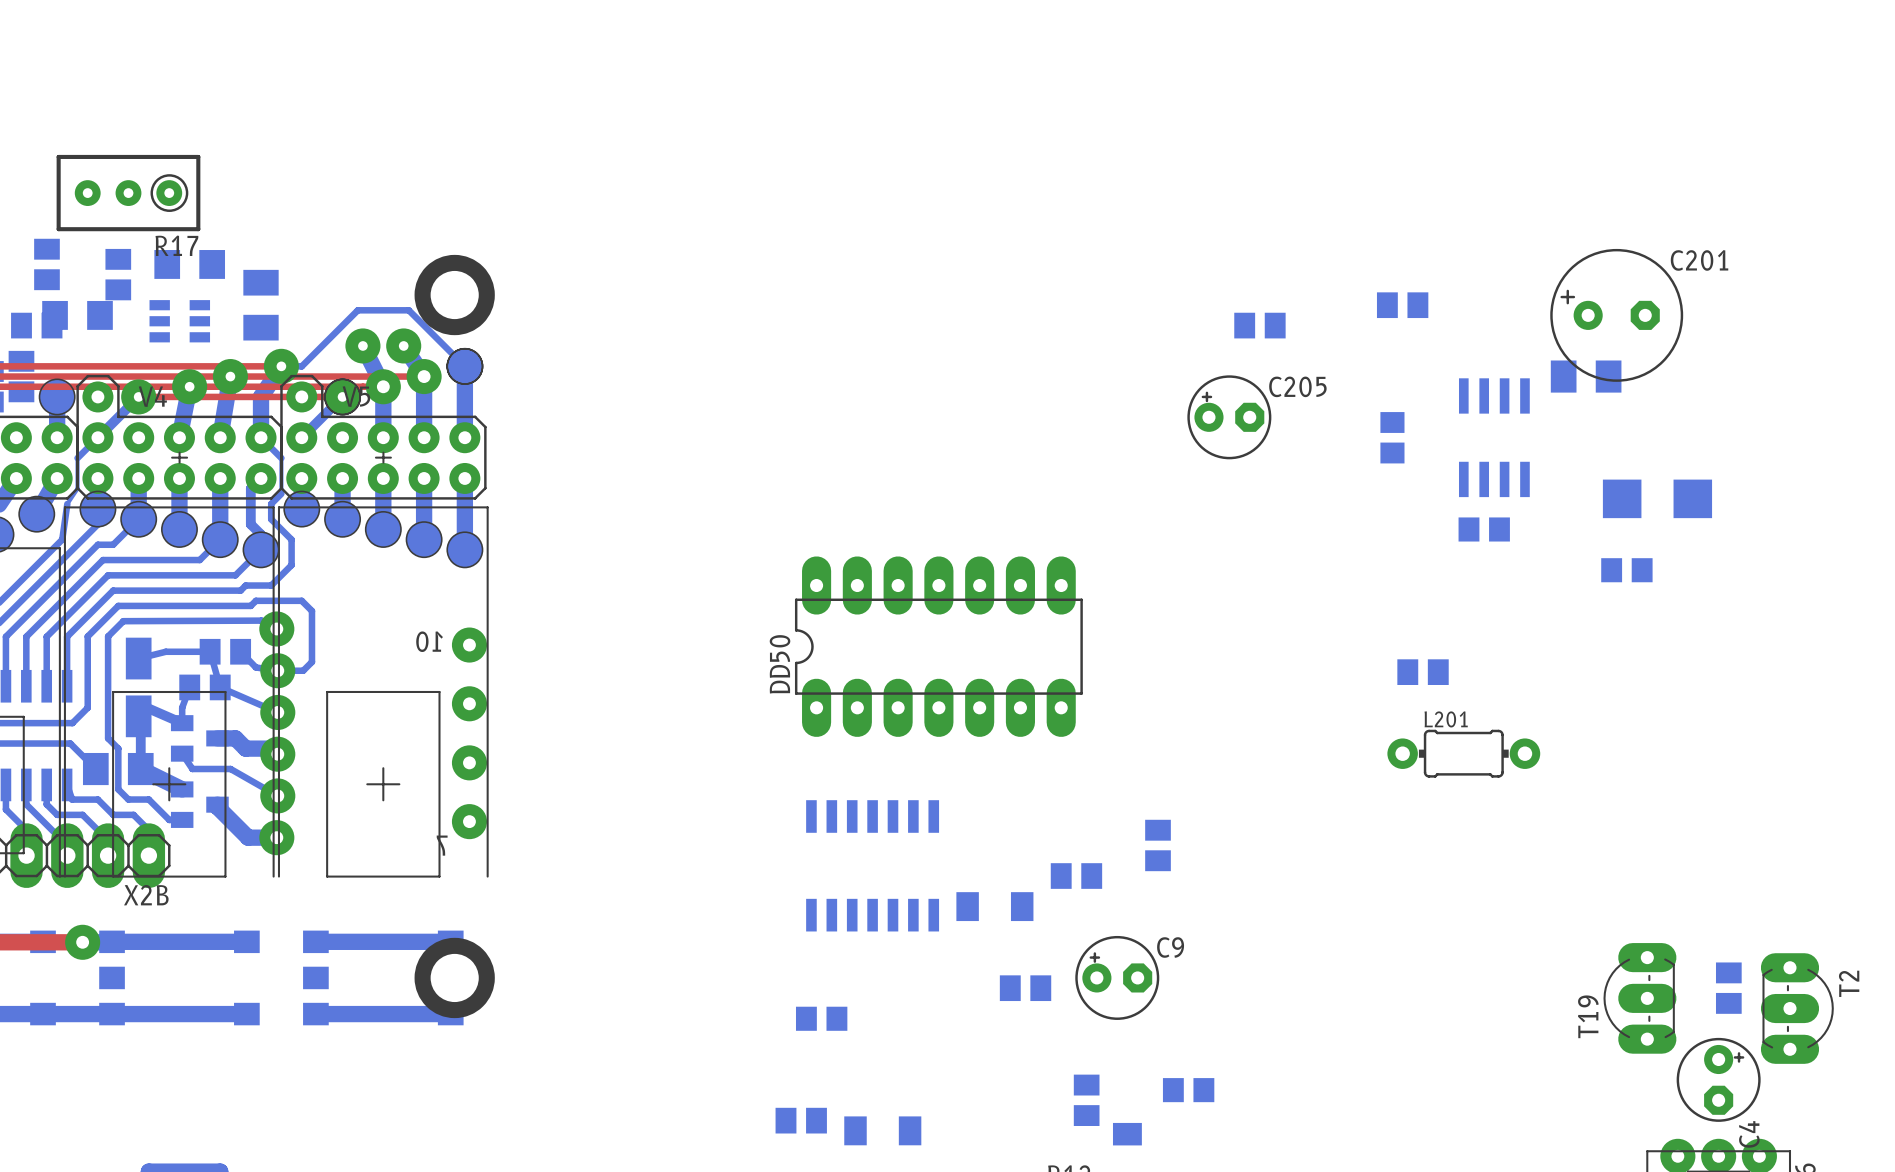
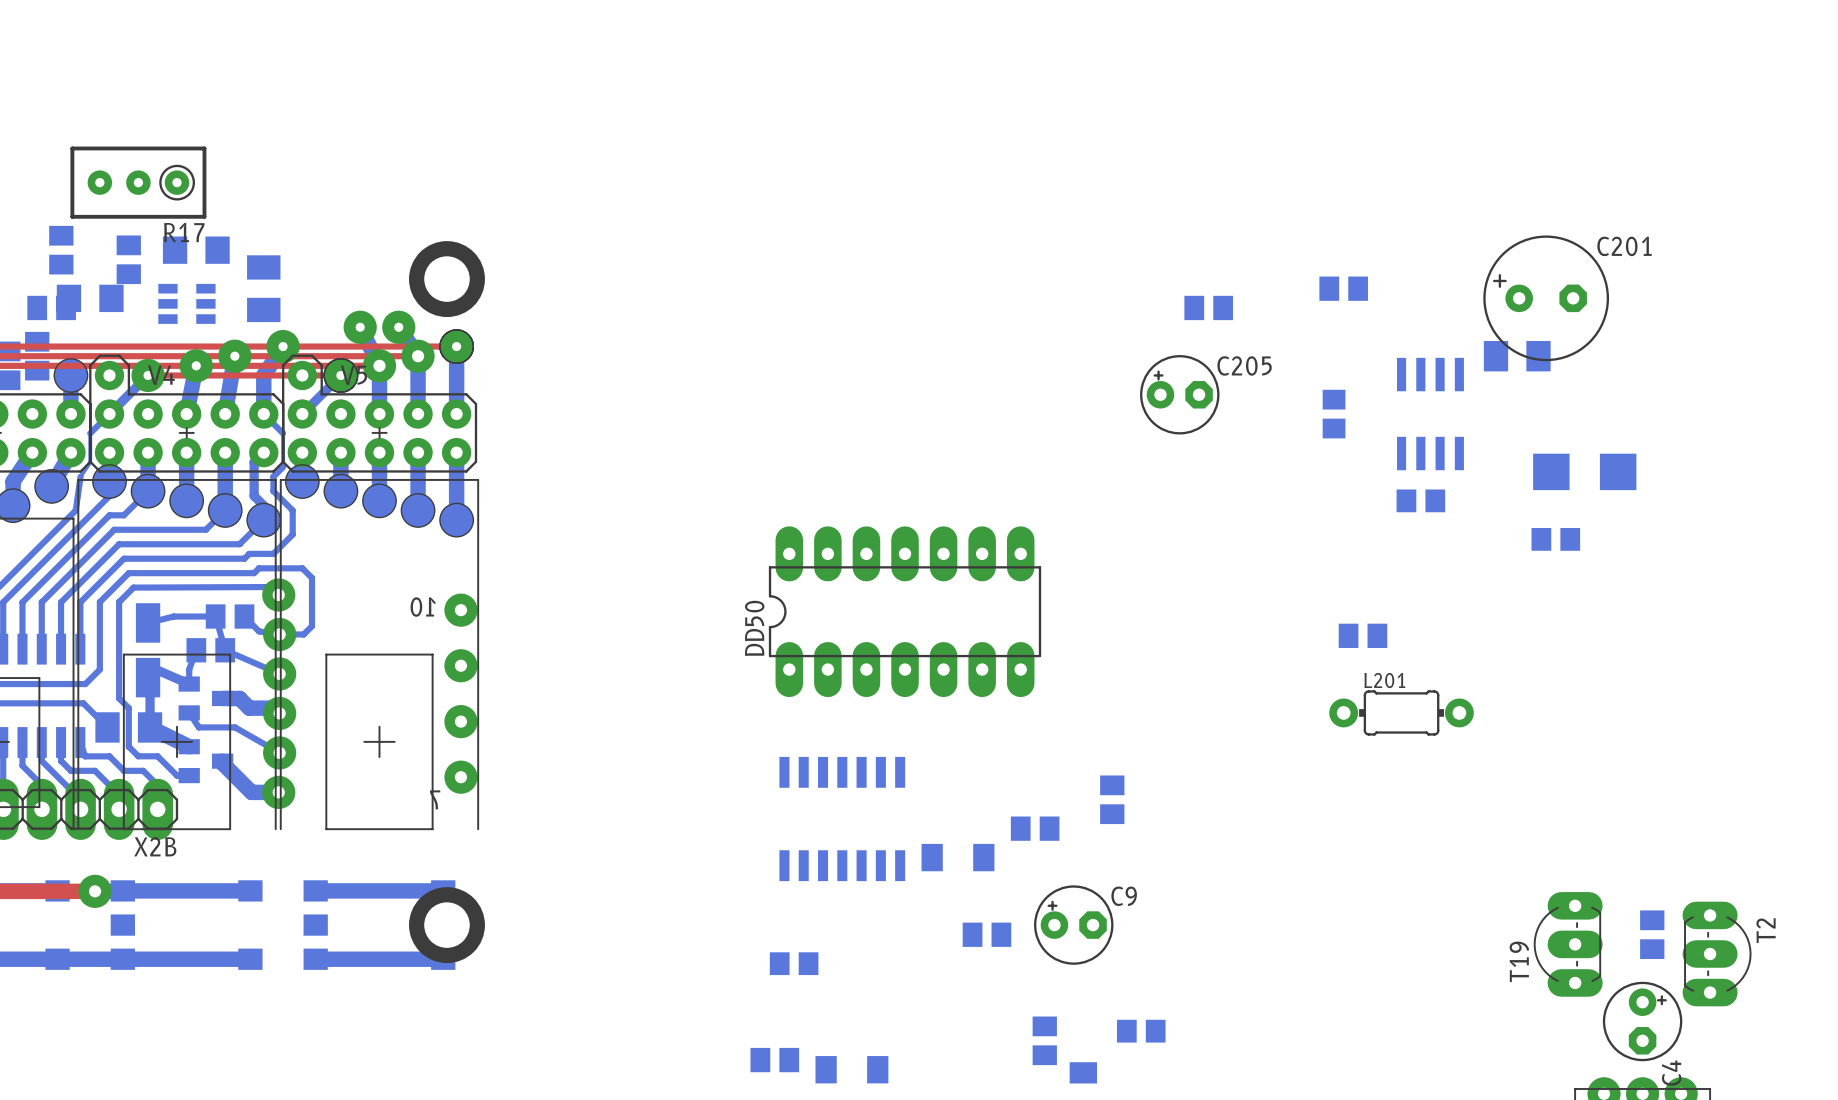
bottom track: (281, 366) (301, 366) (357, 310) (408, 310) (464, 366) -> none
top track: none -> (283, 346) (456, 346)
via: none -> (456, 346)

